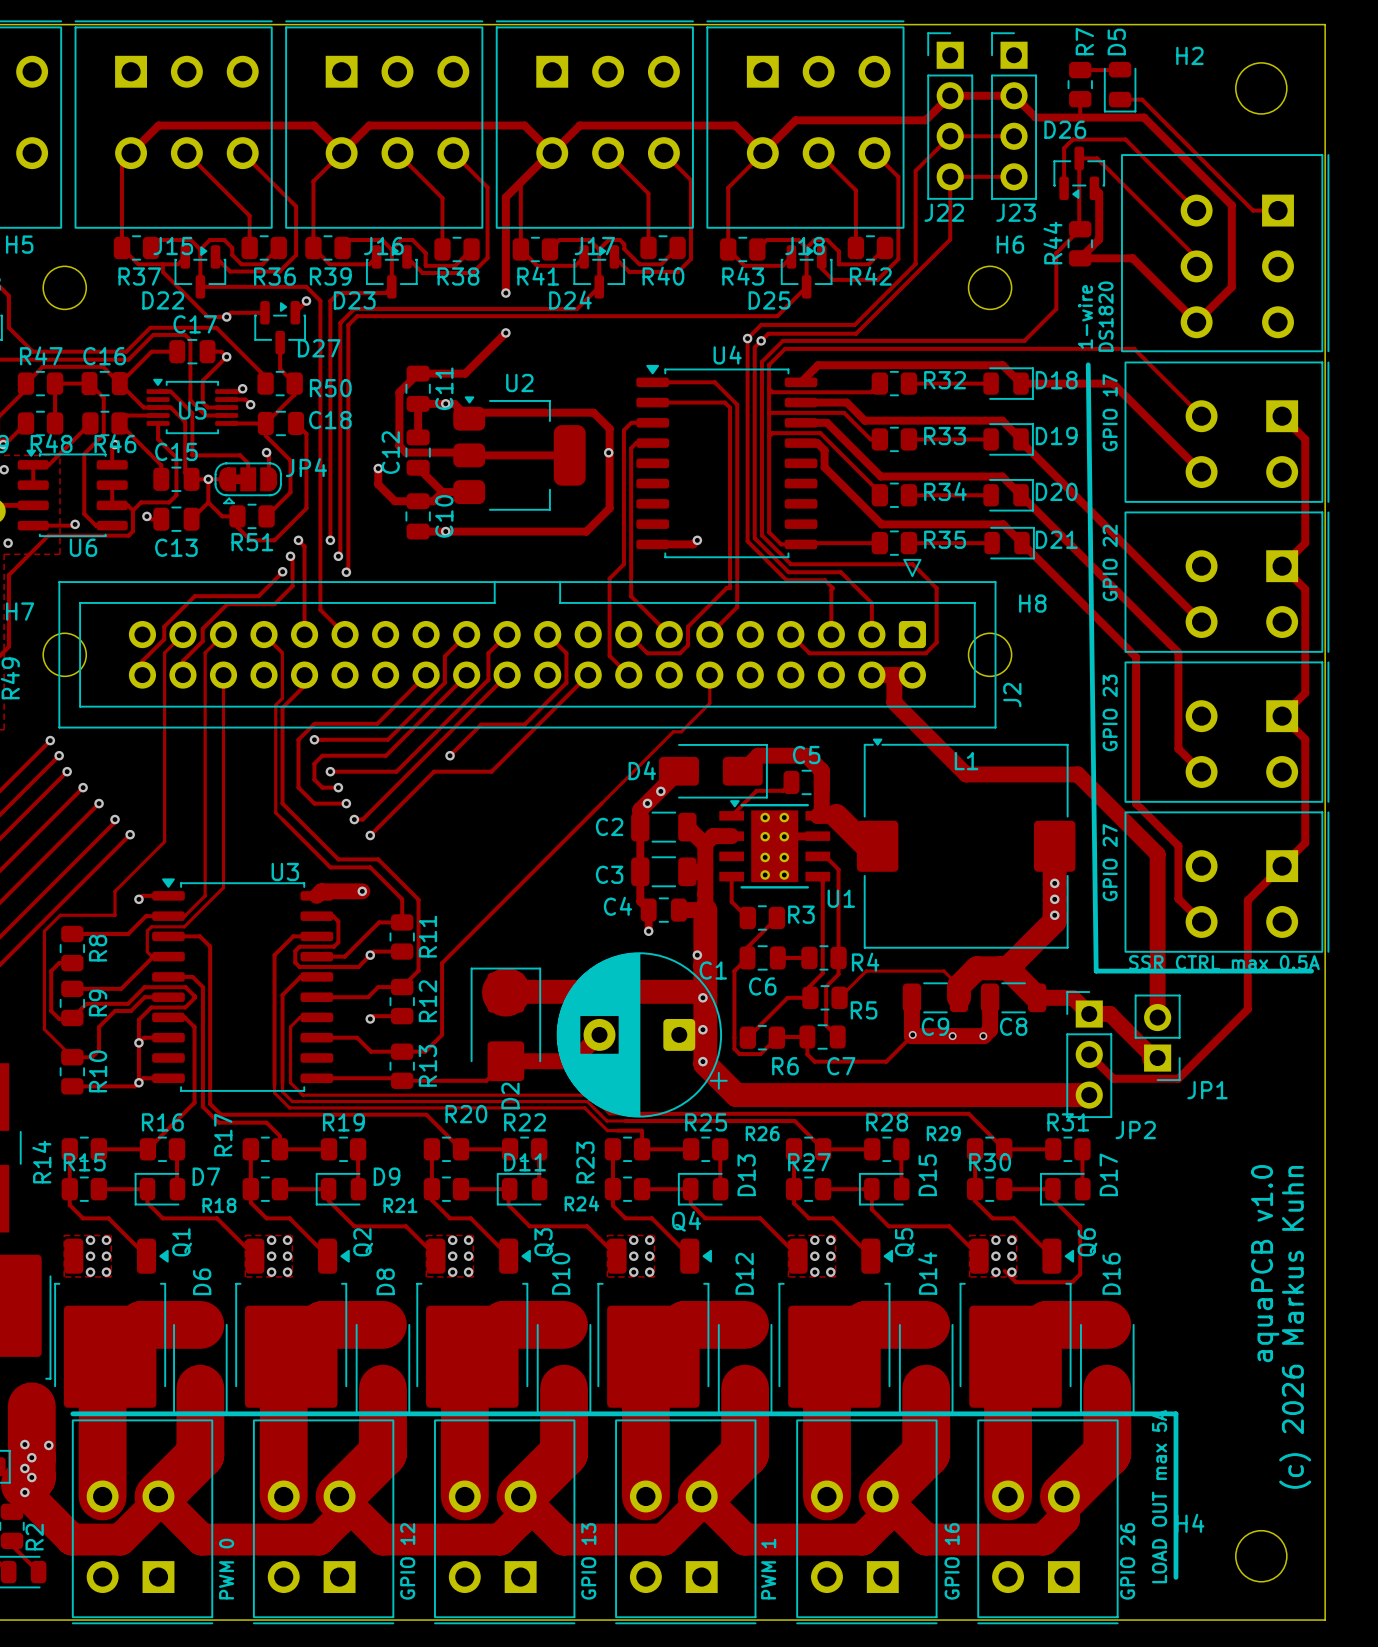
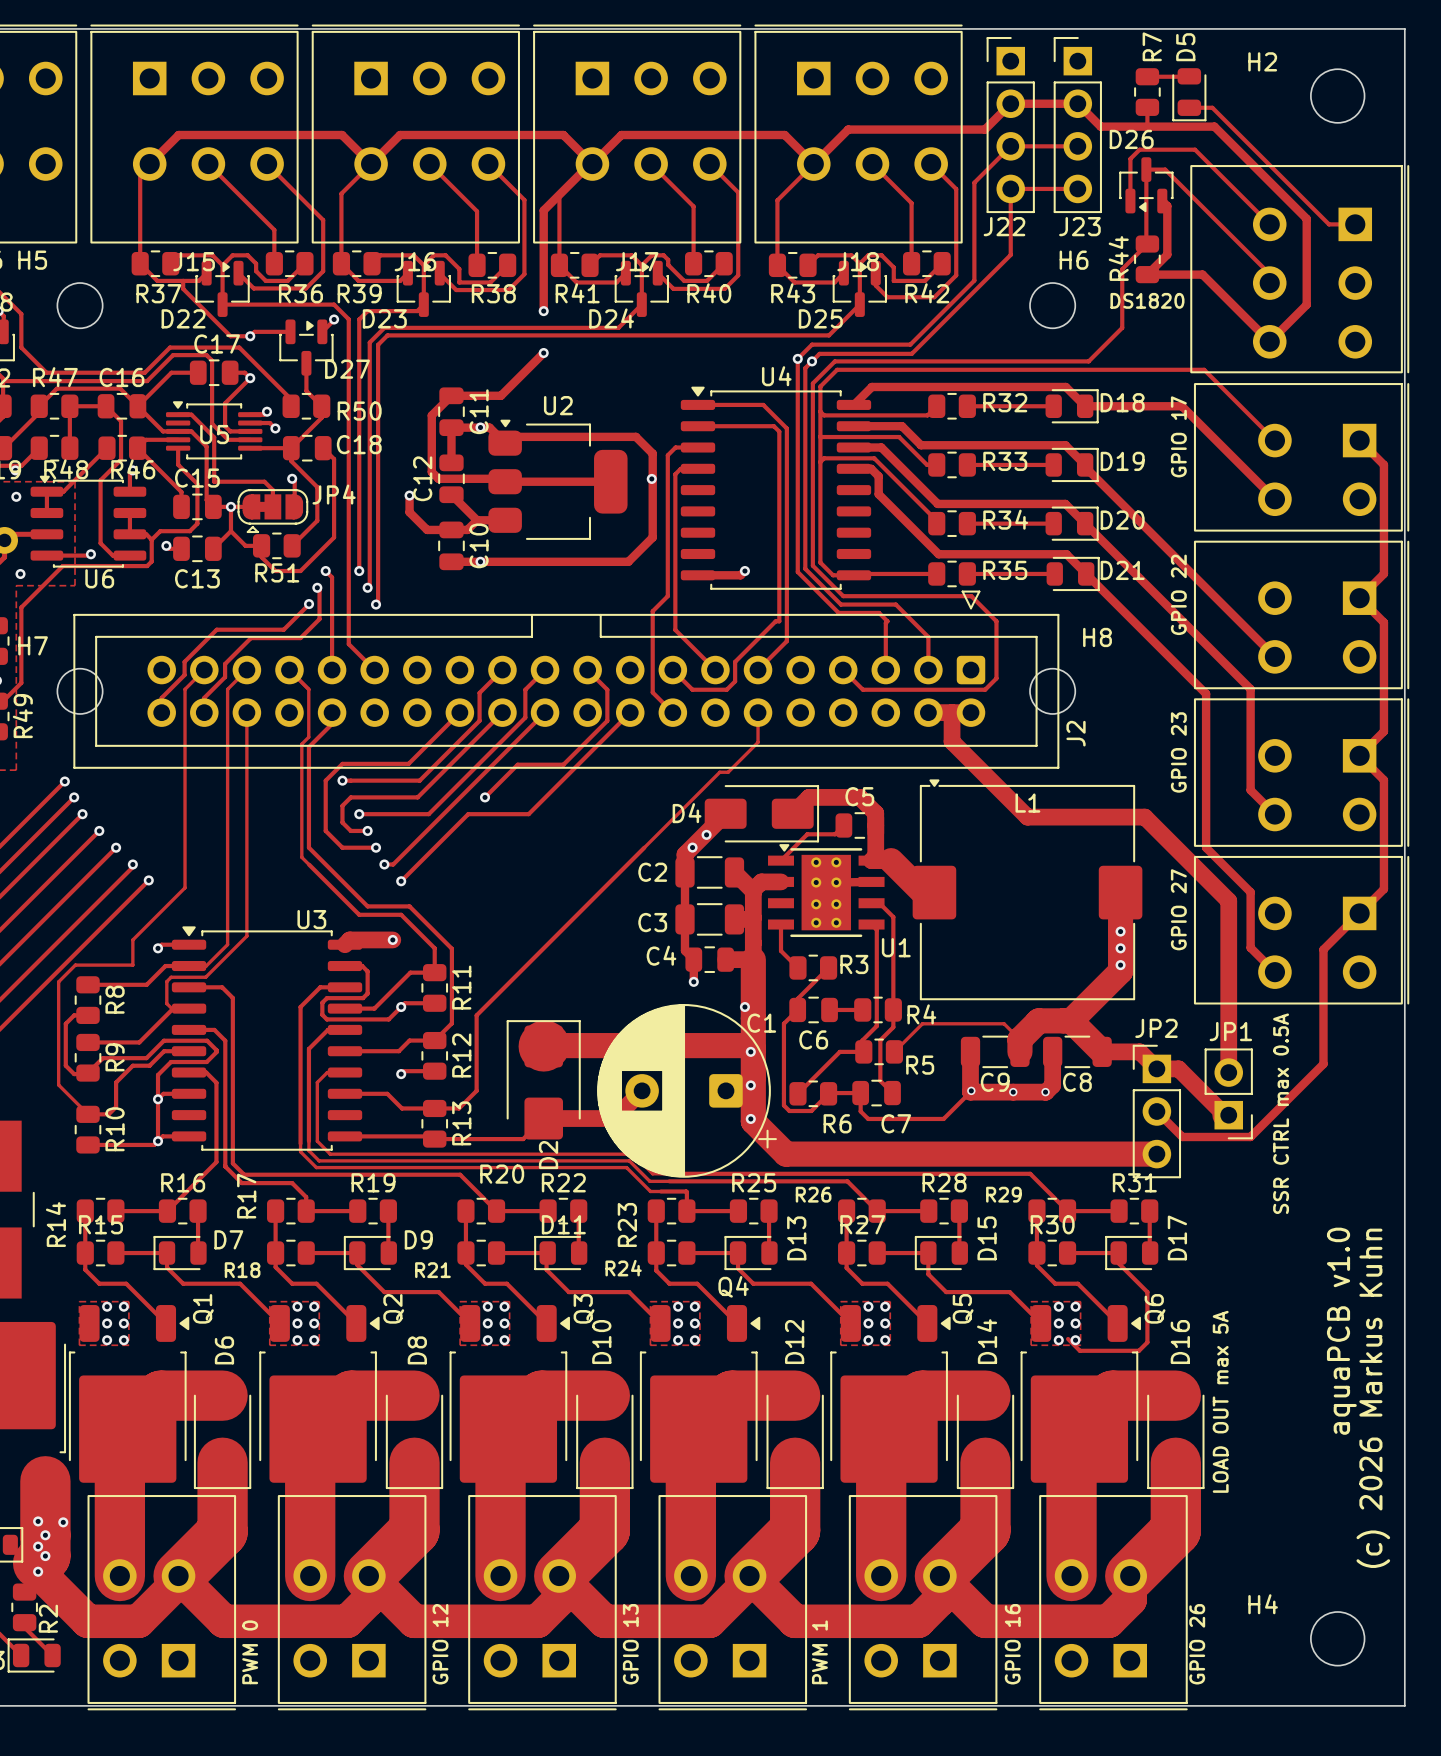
part value: none -> DS1820 (1147, 300)
part text: 1-wire (1085, 316) -> none
part text: DS1820 (1106, 316) -> none
line: (1088, 364) (1096, 971) (1311, 971) -> none
text rotation: 0° (1224, 962) -> 90° counterclockwise (1281, 1113)
JP1 name position: JP1 (1207, 1090) -> JP1 (1230, 1031)
JP2 name position: JP2 (1135, 1130) -> JP2 (1156, 1028)
line: (72, 1413) (1175, 1413) (1175, 1577) -> none
text position: LOAD OUT max 5A (1159, 1496) -> LOAD OUT max 5A (1220, 1401)

